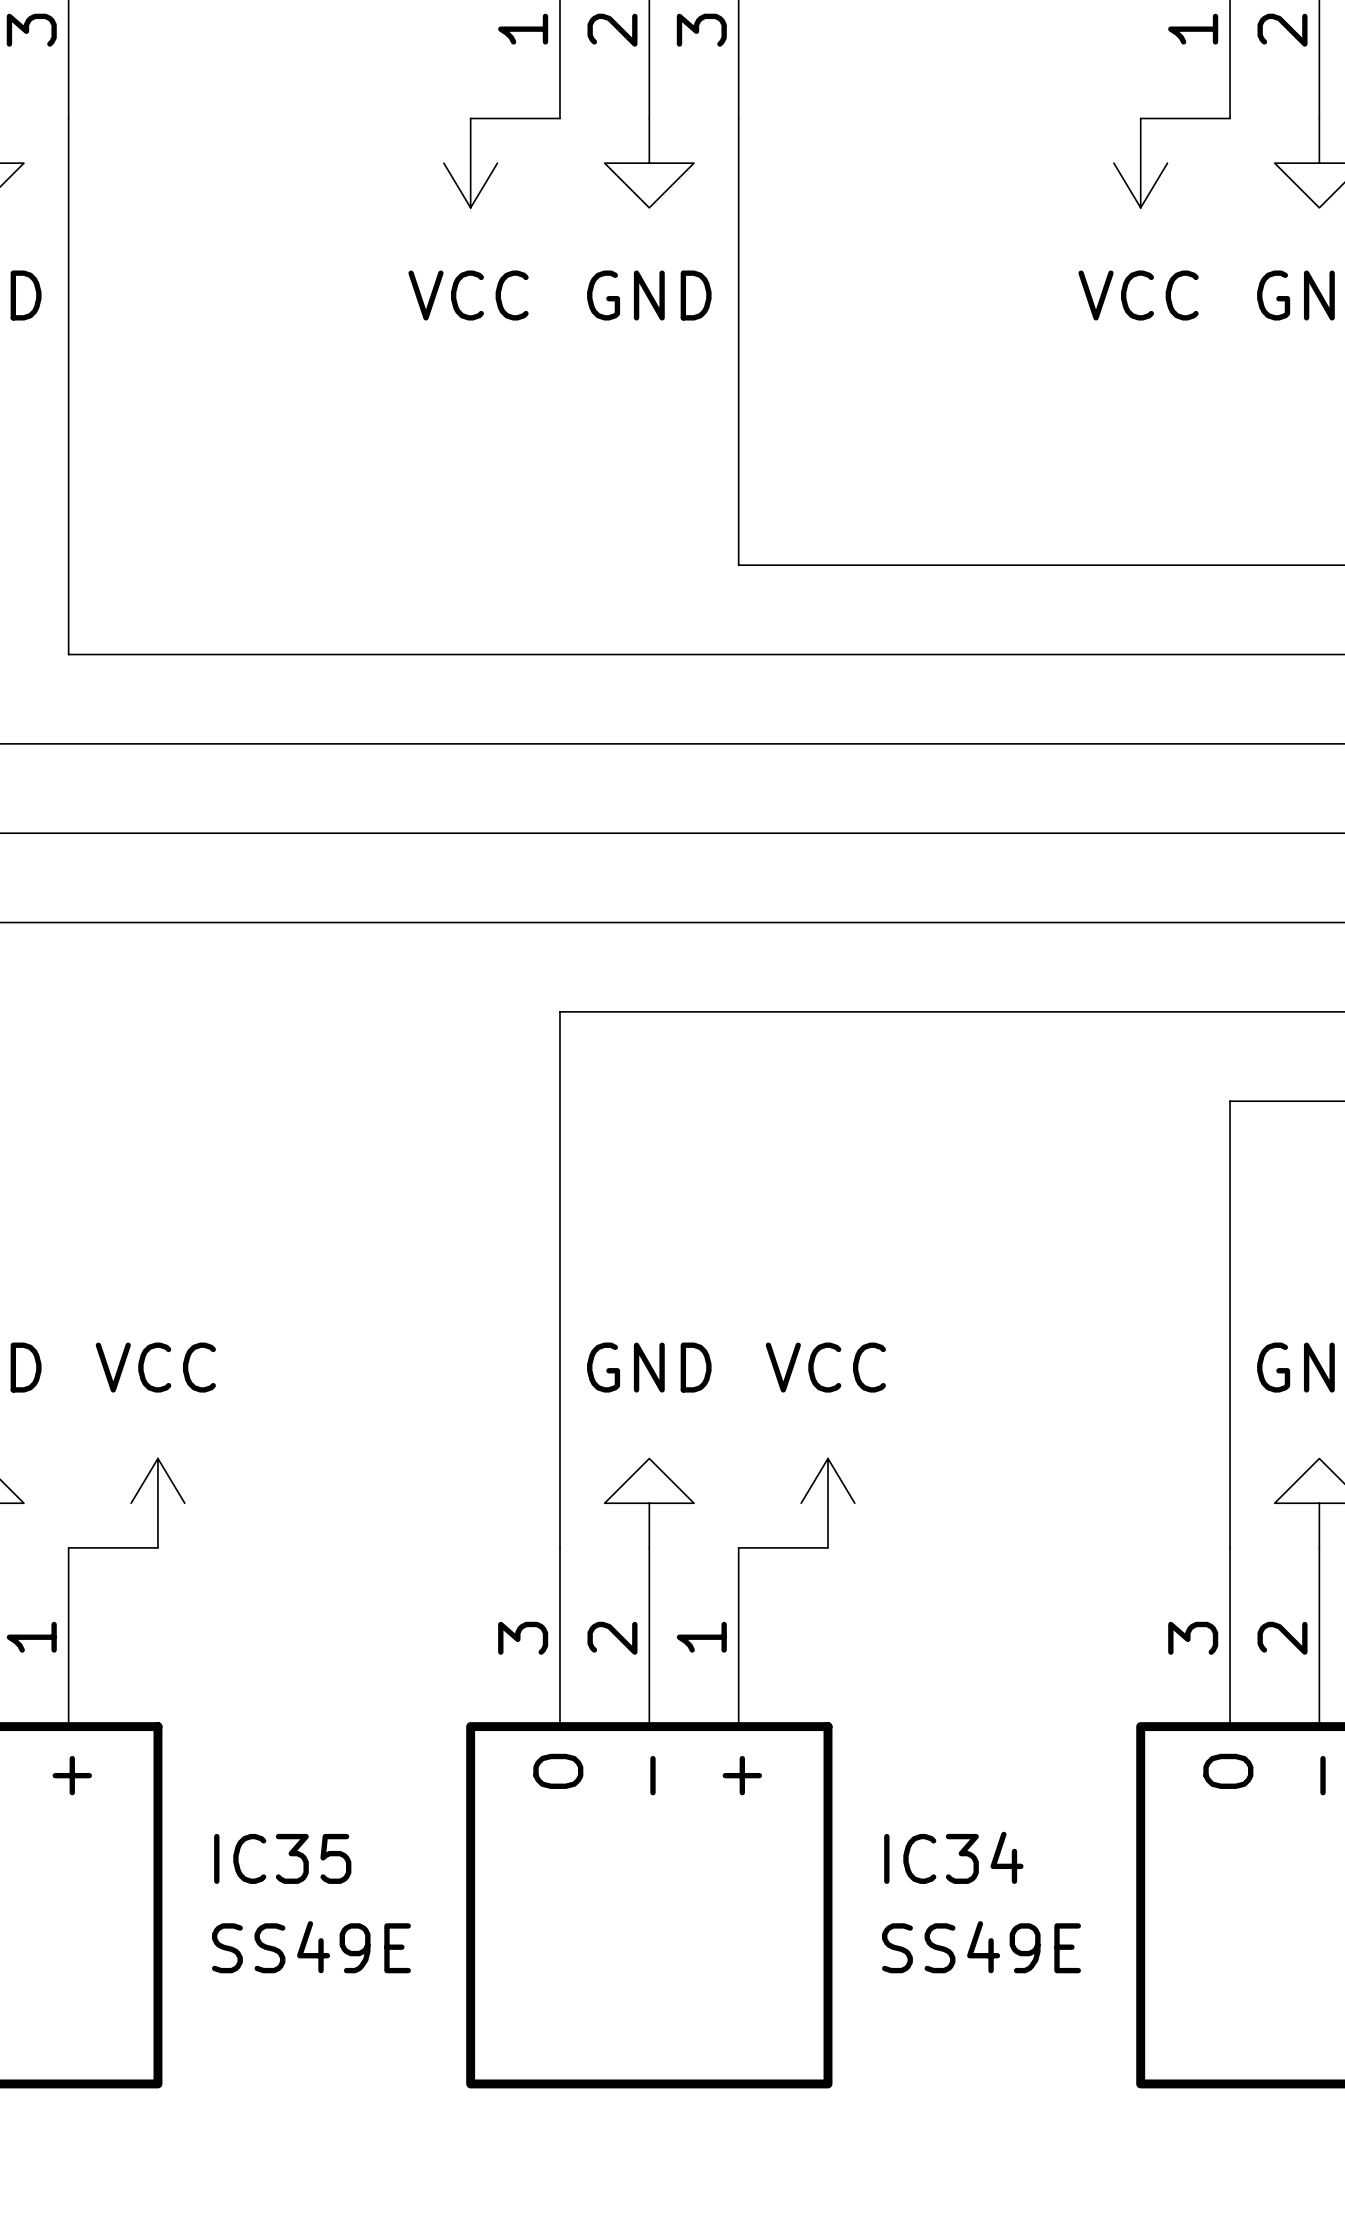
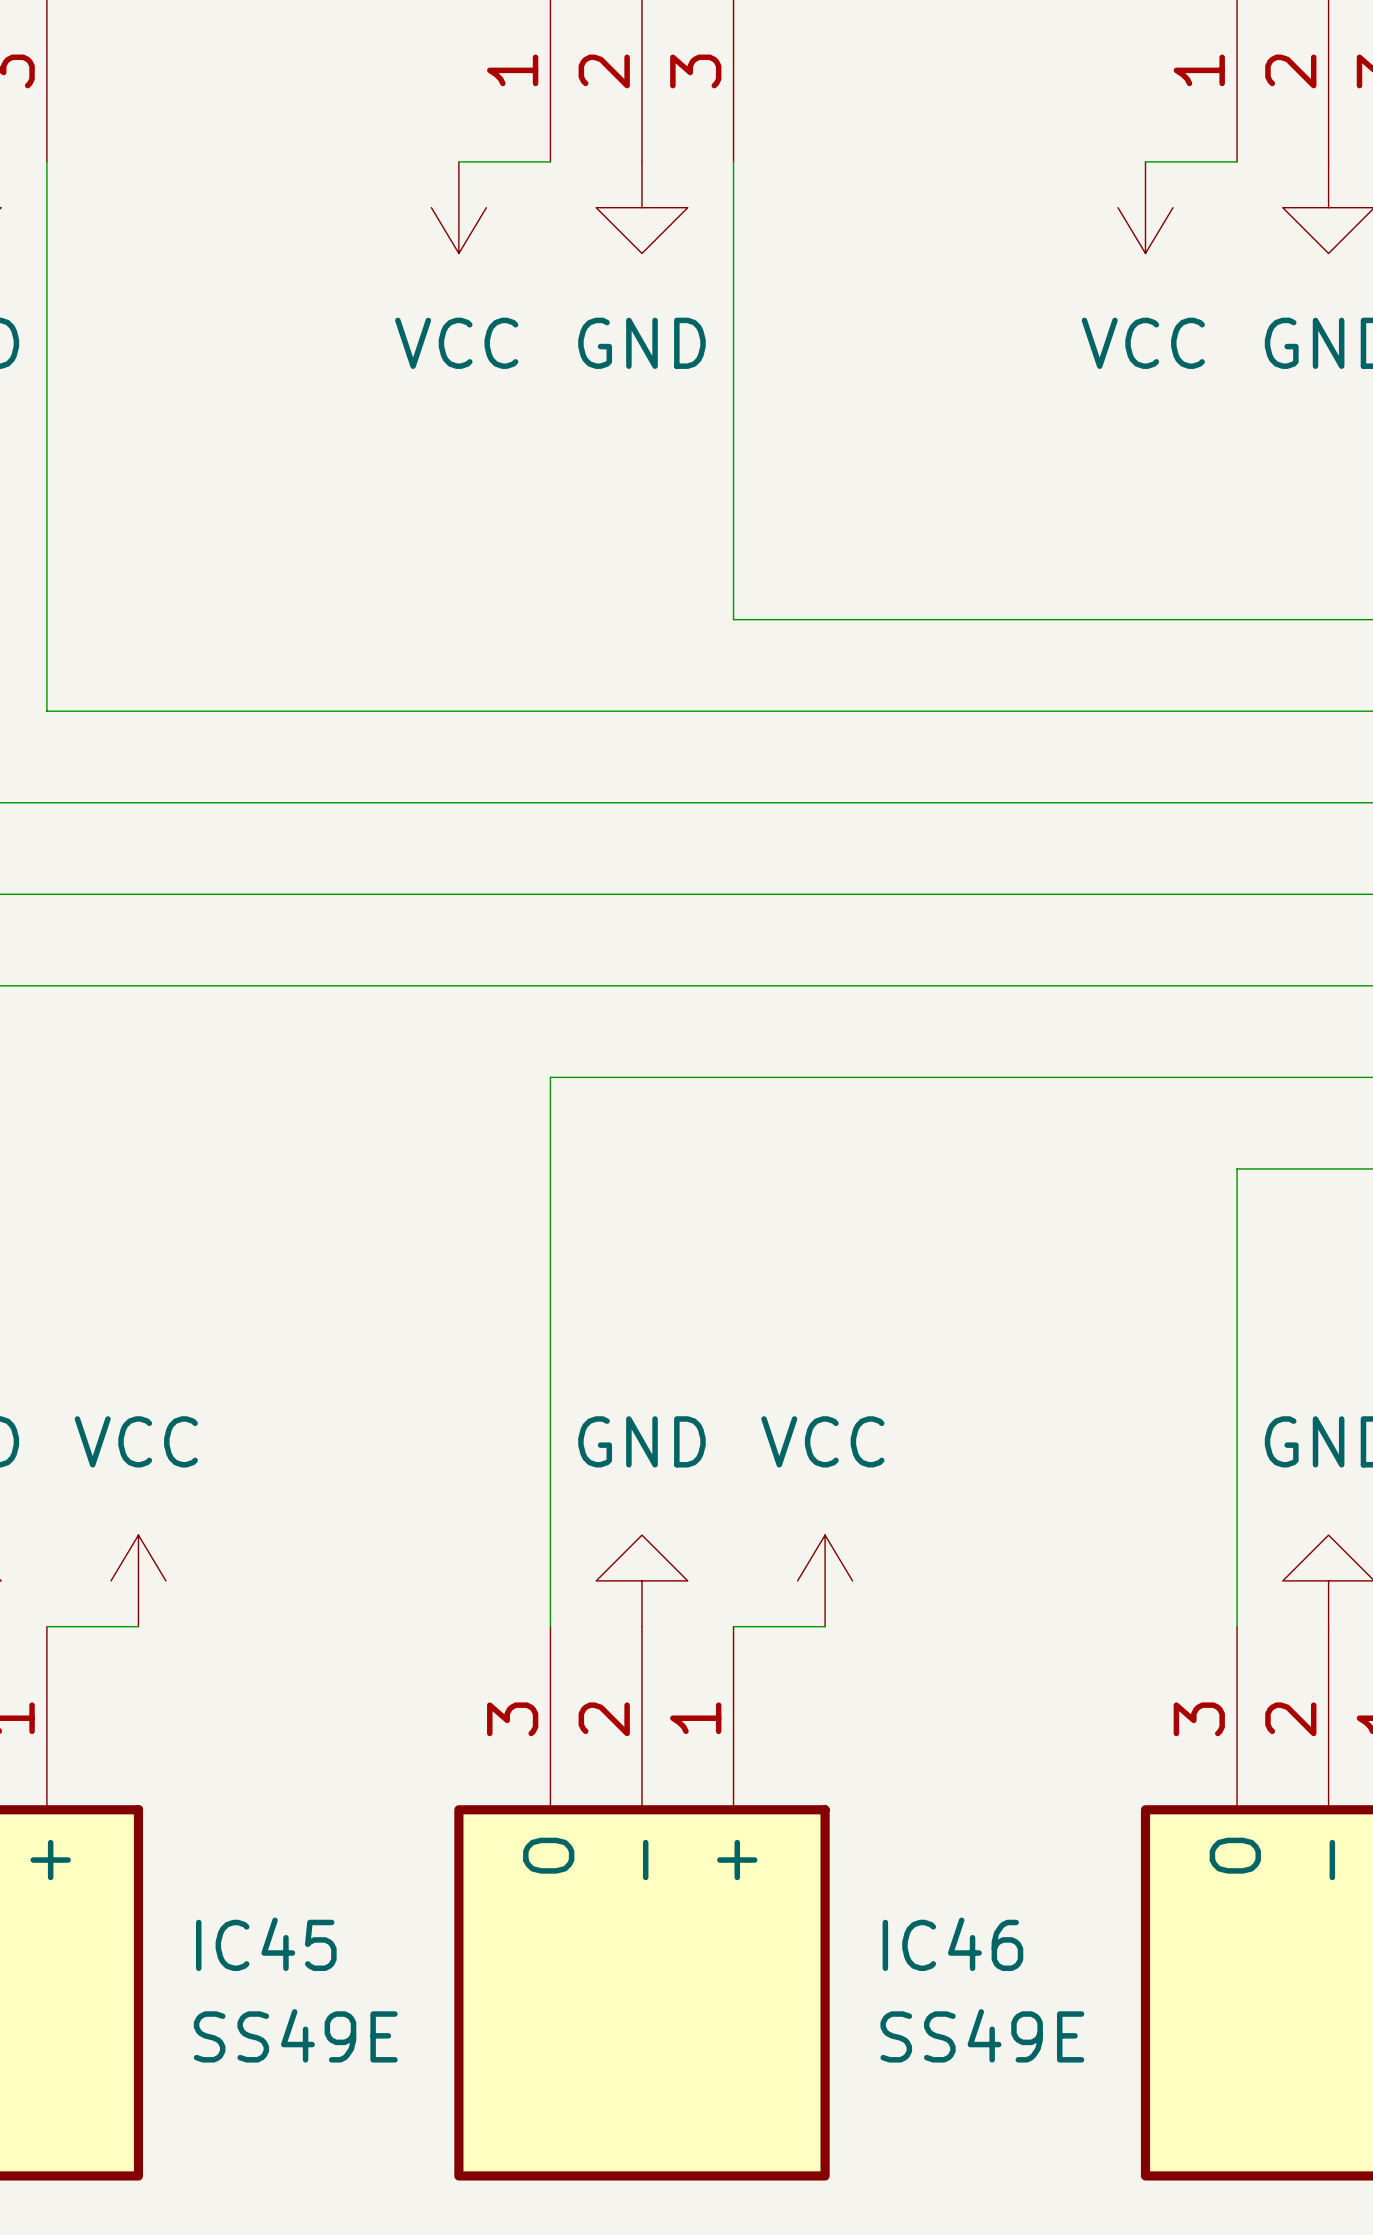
IC34 name: IC34 (953, 1857) -> IC46 (952, 1944)
IC35 name: IC35 (282, 1858) -> IC45 (266, 1944)

